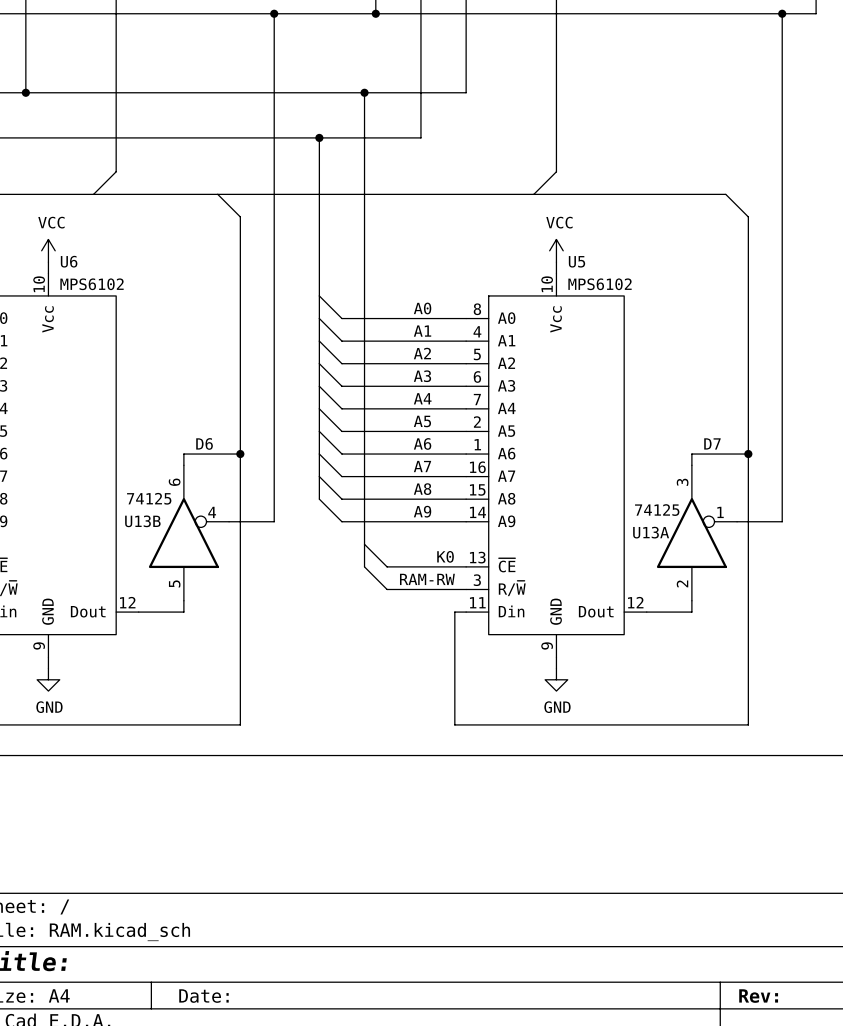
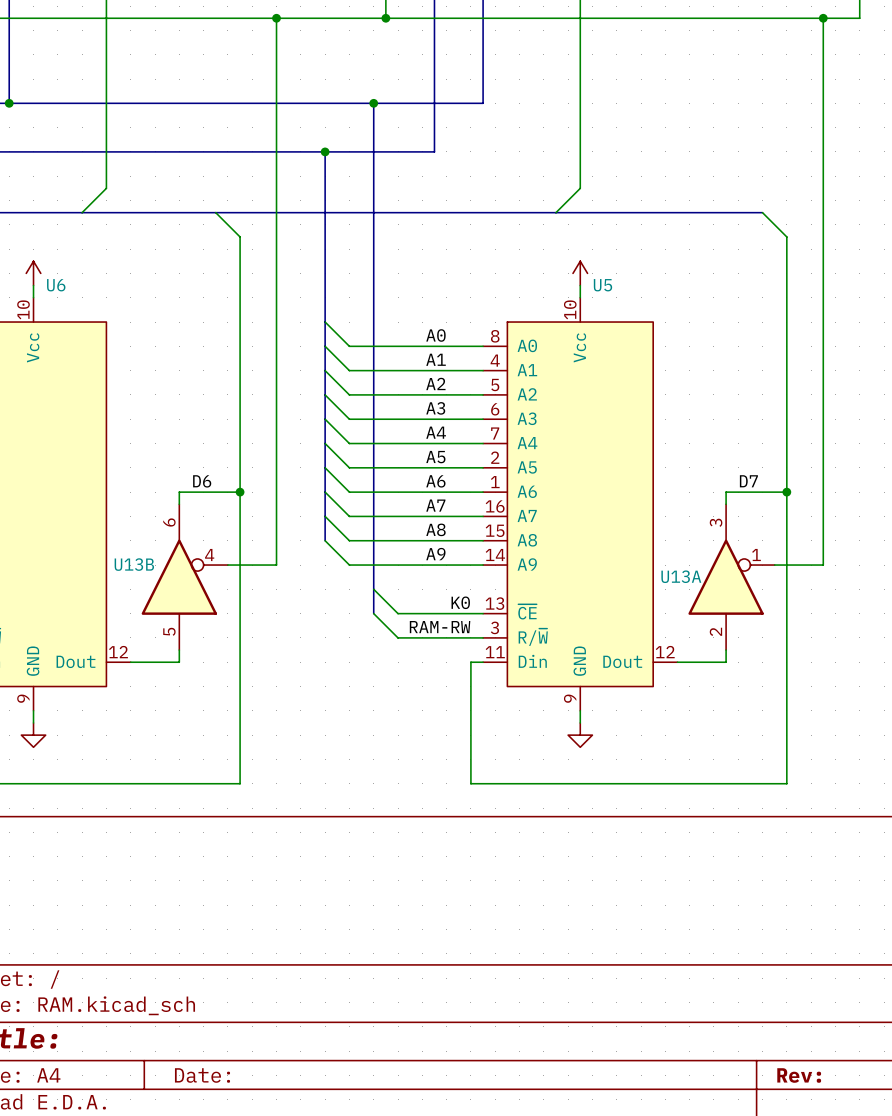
power symbol text: VCC (51, 222) -> none
power symbol text: VCC (559, 222) -> none
U6 value: MPS6102 (92, 284) -> none
U5 value: MPS6102 (600, 284) -> none
U13B value: 74125 (149, 498) -> none
U13A value: 74125 (657, 510) -> none
power symbol text: GND (49, 707) -> none
power symbol text: GND (557, 707) -> none

